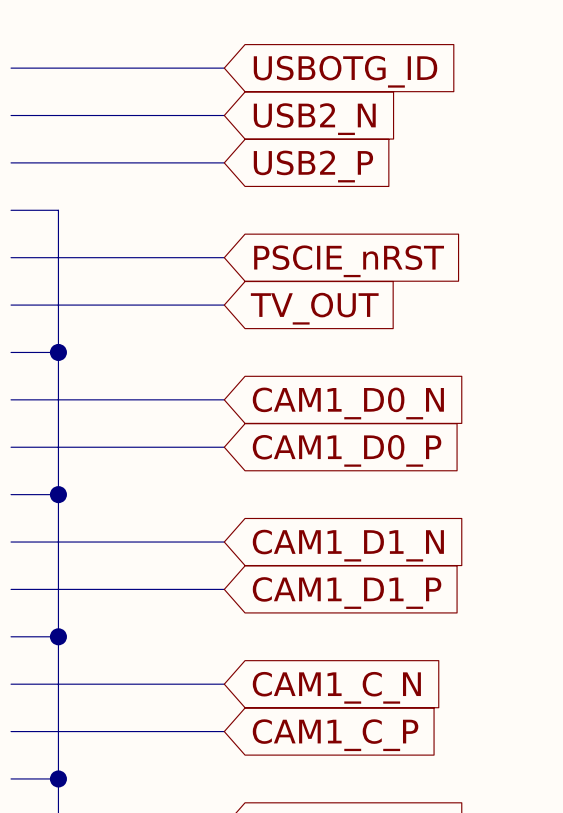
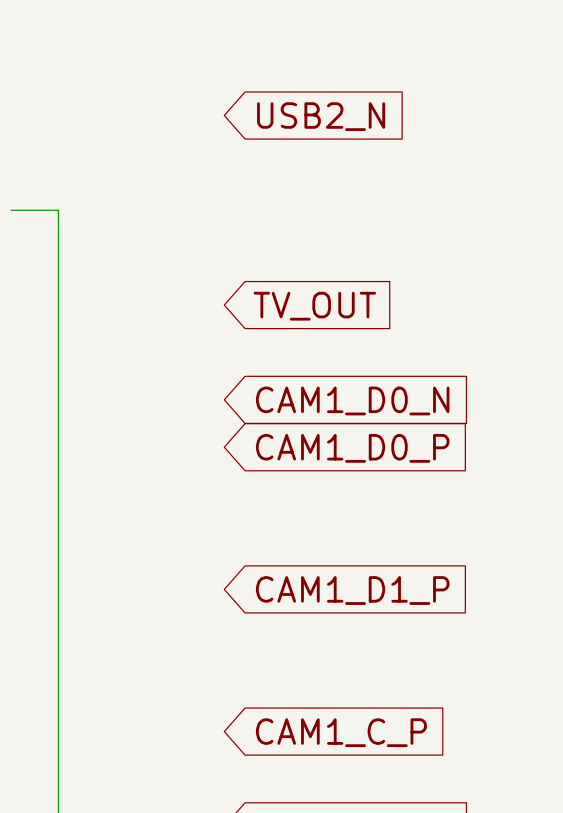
wire: (11, 68) (224, 68) -> none
global label: USBOTG_ID (345, 71) -> none
wire: (11, 115) (224, 115) -> none
wire: (11, 162) (224, 162) -> none
global label: USB2_P (313, 166) -> none
wire: (11, 257) (224, 257) -> none
global label: PSCIE_nRST (349, 261) -> none
wire: (11, 305) (224, 305) -> none
wire: (11, 352) (58, 352) -> none
junction: (58, 352) -> none
wire: (11, 399) (224, 399) -> none
wire: (11, 447) (224, 447) -> none
wire: (11, 494) (58, 494) -> none
junction: (58, 494) -> none
wire: (11, 542) (224, 542) -> none
global label: CAM1_D1_N (348, 545) -> none
wire: (11, 589) (224, 589) -> none
wire: (11, 636) (58, 636) -> none
junction: (58, 636) -> none
wire: (11, 684) (224, 684) -> none
global label: CAM1_C_N (336, 687) -> none
wire: (11, 731) (224, 731) -> none
wire: (11, 778) (58, 778) -> none
junction: (58, 778) -> none

